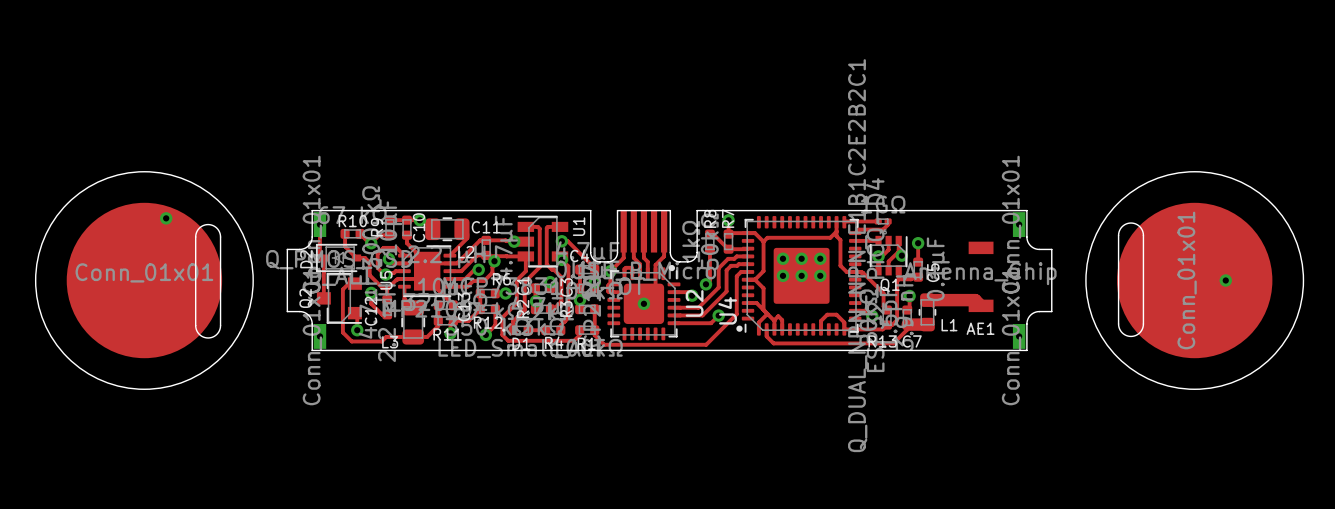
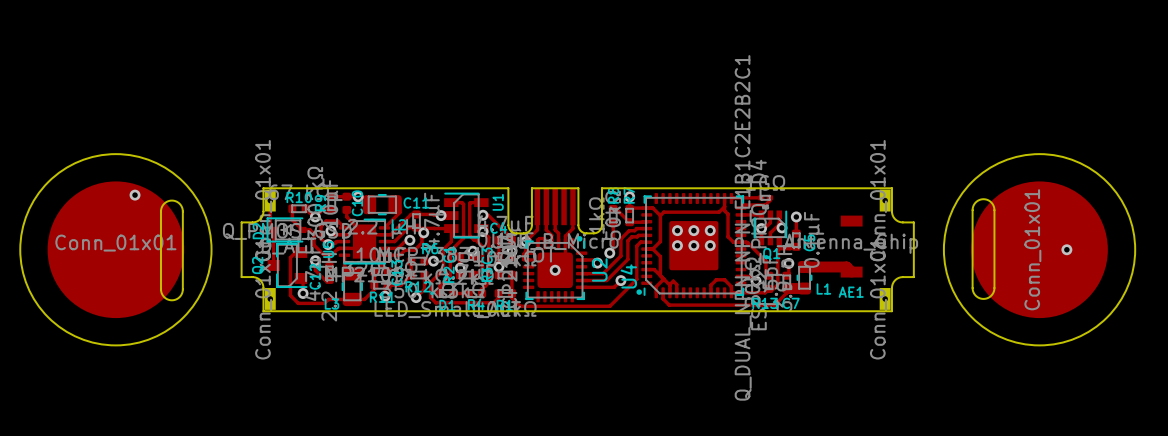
C10 footprint: [402, 215, 412, 240] -> [342, 192, 352, 214]

